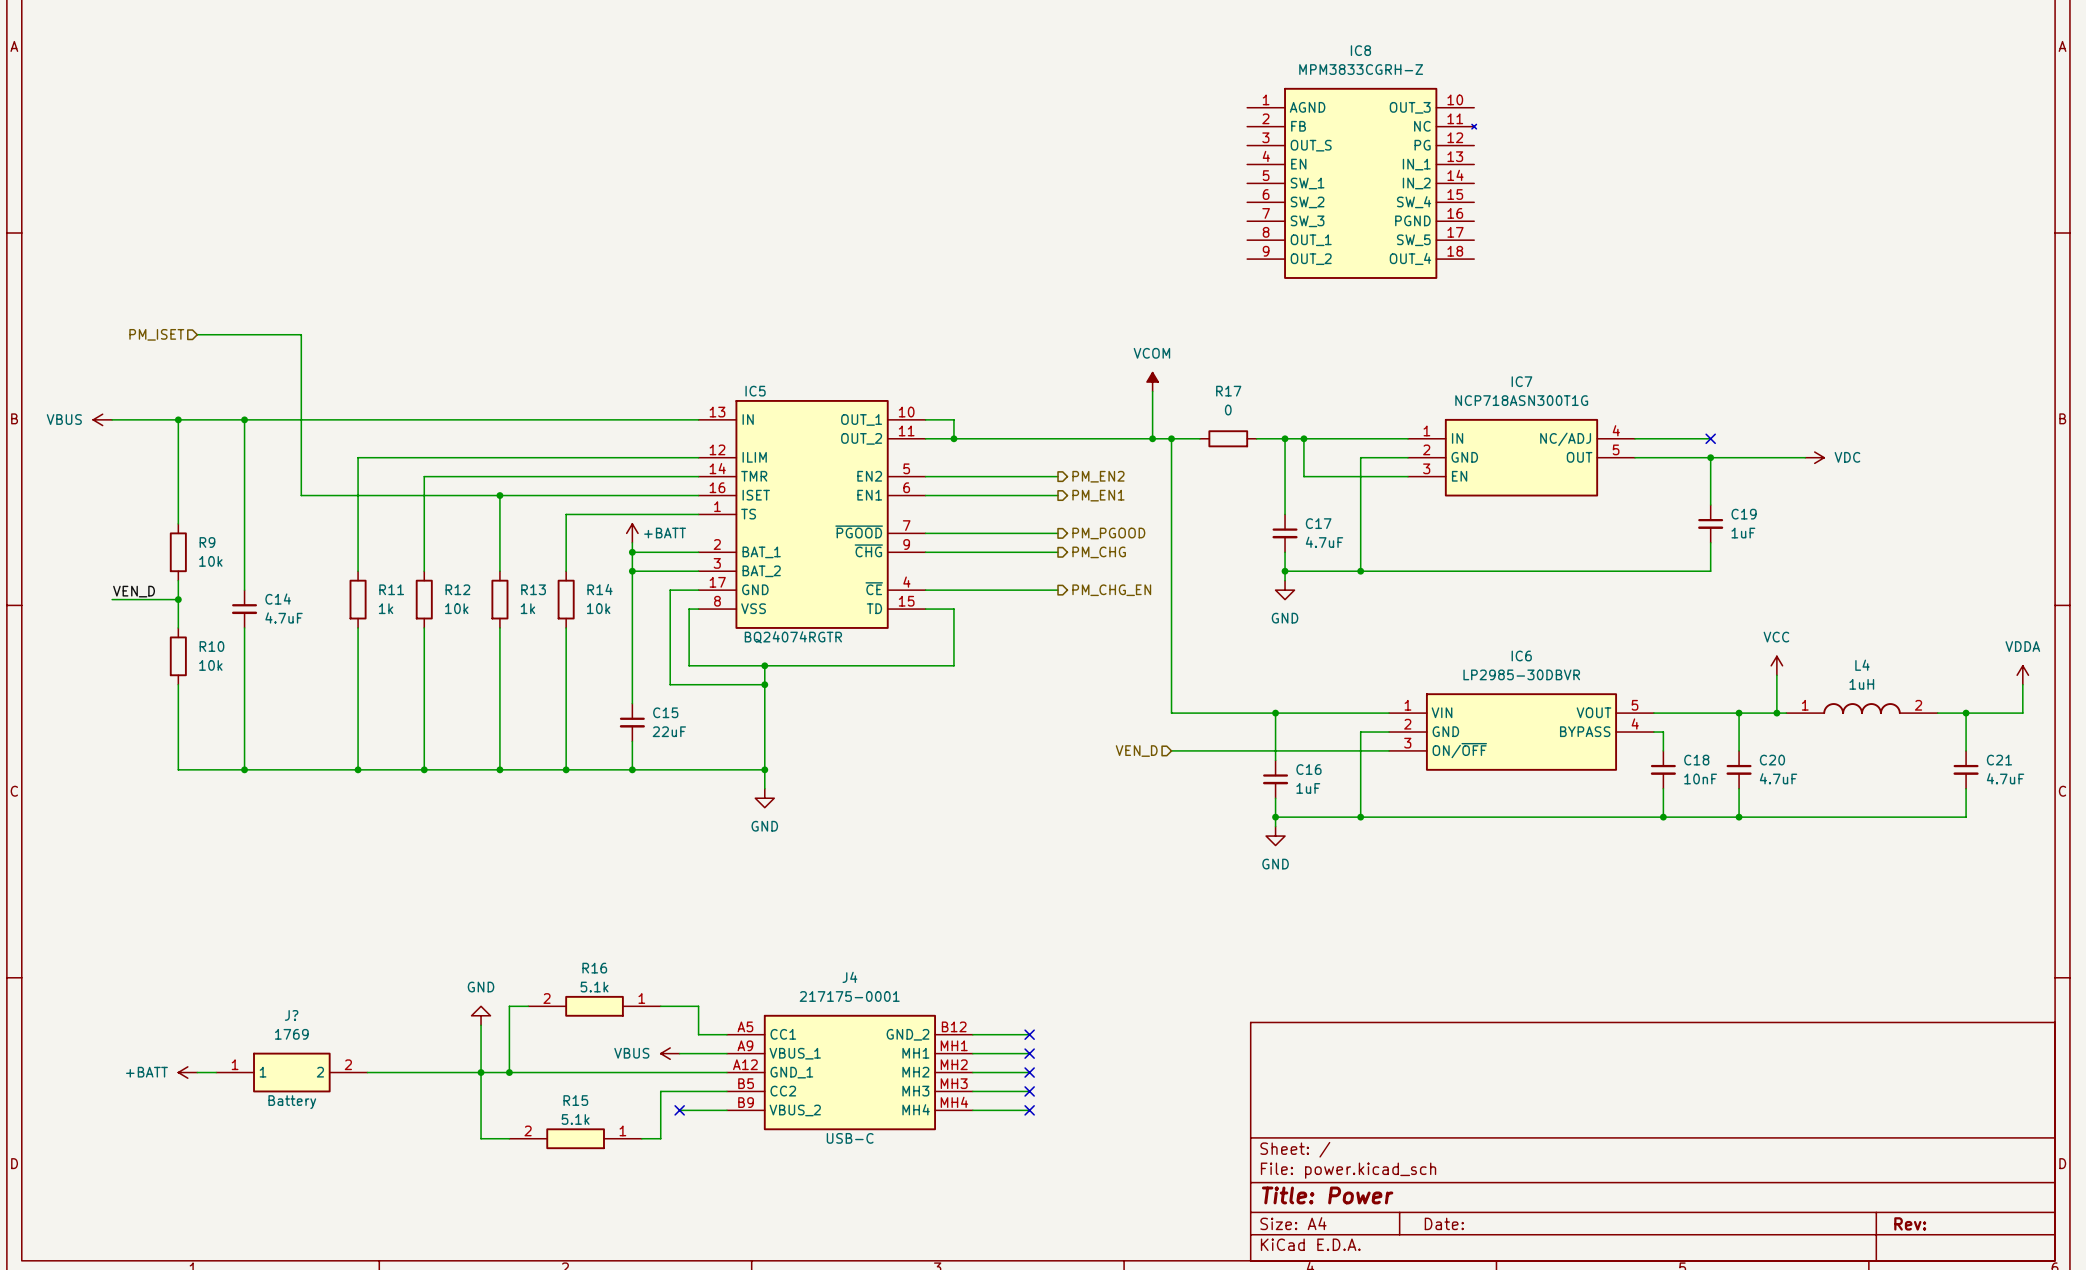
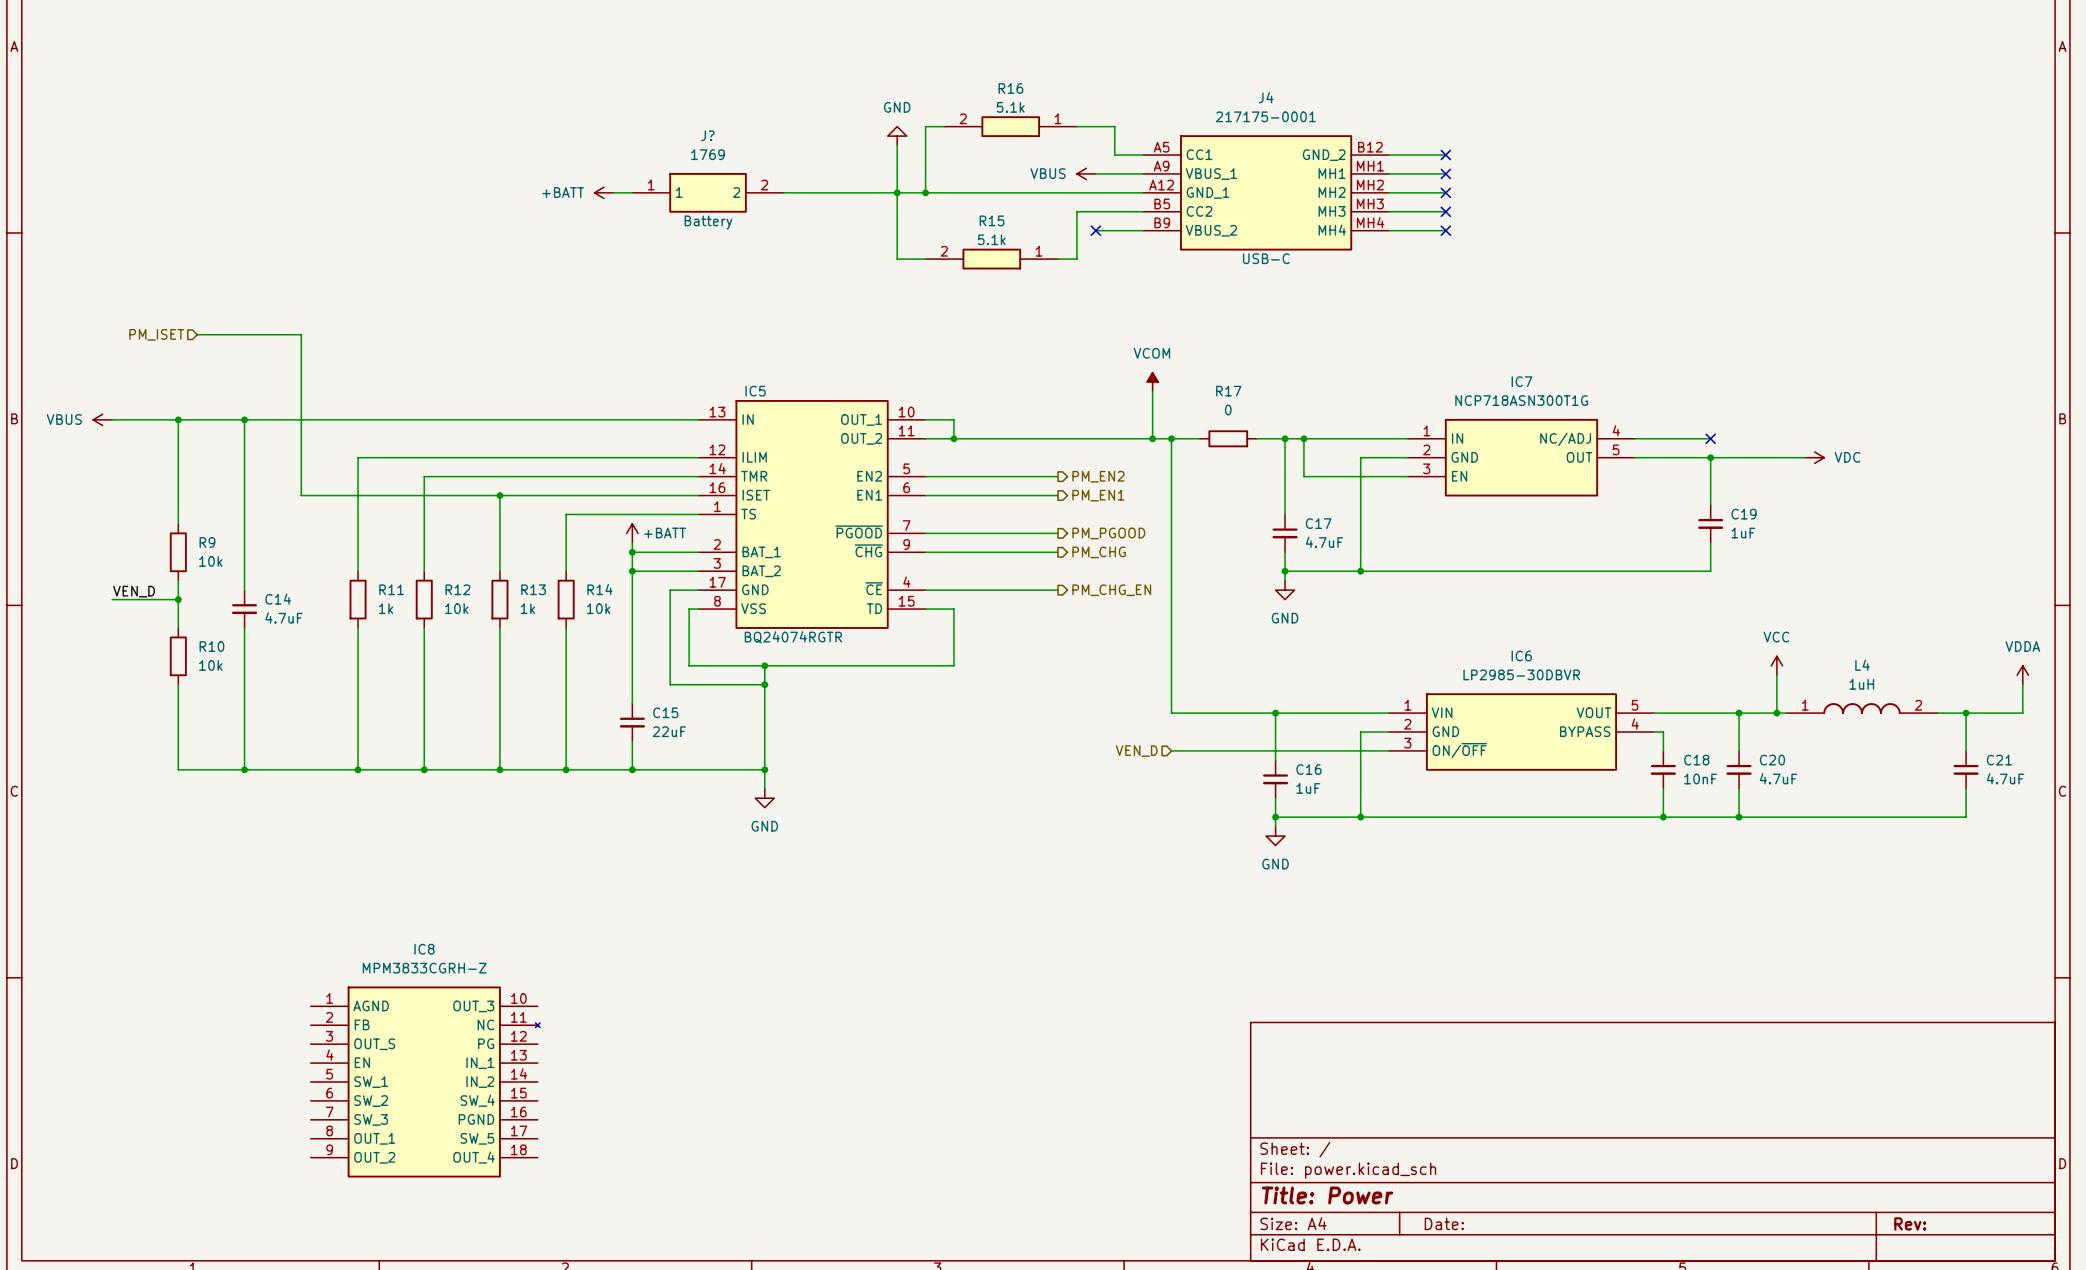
wire: none -> (944, 126) (925, 126) (925, 192)
wire: none -> (1076, 126) (1114, 126) (1114, 155) (1143, 155)
power symbol: none -> GND (897, 136)
wire: none -> (897, 145) (897, 259) (925, 259)
no-connect mark: none -> (1445, 155)
power symbol: none -> VBUS (1086, 173)
wire: none -> (1095, 173) (1143, 173)
no-connect mark: none -> (1445, 173)
IC8 position: (1361, 183) -> (425, 1081)
power symbol: none -> +BATT (603, 192)
wire: none -> (613, 192) (632, 192)
J?: none -> 1769 (708, 192)
wire: none -> (783, 192) (1143, 192)
junction: none -> (897, 192)
junction: none -> (925, 192)
no-connect mark: none -> (1445, 192)
wire: none -> (1143, 211) (1076, 211) (1076, 259) (1058, 259)
no-connect mark: none -> (1445, 211)
wire: none -> (1095, 230) (1143, 230)
no-connect mark: none -> (1095, 230)
no-connect mark: none -> (1445, 230)
wire: (528, 1006) (509, 1006) (509, 1072) -> none
R16 position: (594, 1006) -> (1010, 126)
wire: (660, 1006) (698, 1006) (698, 1034) (726, 1034) -> none
power symbol: GND (481, 1015) -> none
wire: (972, 1034) (1029, 1034) -> none
no-connect mark: (1029, 1034) -> none
power symbol: VBUS (670, 1053) -> none
wire: (679, 1053) (726, 1053) -> none
wire: (972, 1053) (1029, 1053) -> none
no-connect mark: (1029, 1053) -> none
power symbol: +BATT (187, 1072) -> none
wire: (197, 1072) (216, 1072) -> none
J?: 1769 (291, 1072) -> none
wire: (367, 1072) (726, 1072) -> none
junction: (481, 1072) -> none
junction: (509, 1072) -> none
J4 position: (849, 1072) -> (1266, 192)
wire: (972, 1072) (1029, 1072) -> none
no-connect mark: (1029, 1072) -> none
wire: (726, 1091) (660, 1091) (660, 1138) (641, 1138) -> none
wire: (972, 1091) (1029, 1091) -> none
no-connect mark: (1029, 1091) -> none
wire: (679, 1110) (726, 1110) -> none
no-connect mark: (679, 1110) -> none
wire: (972, 1110) (1029, 1110) -> none
no-connect mark: (1029, 1110) -> none
R15 position: (575, 1138) -> (991, 259)

